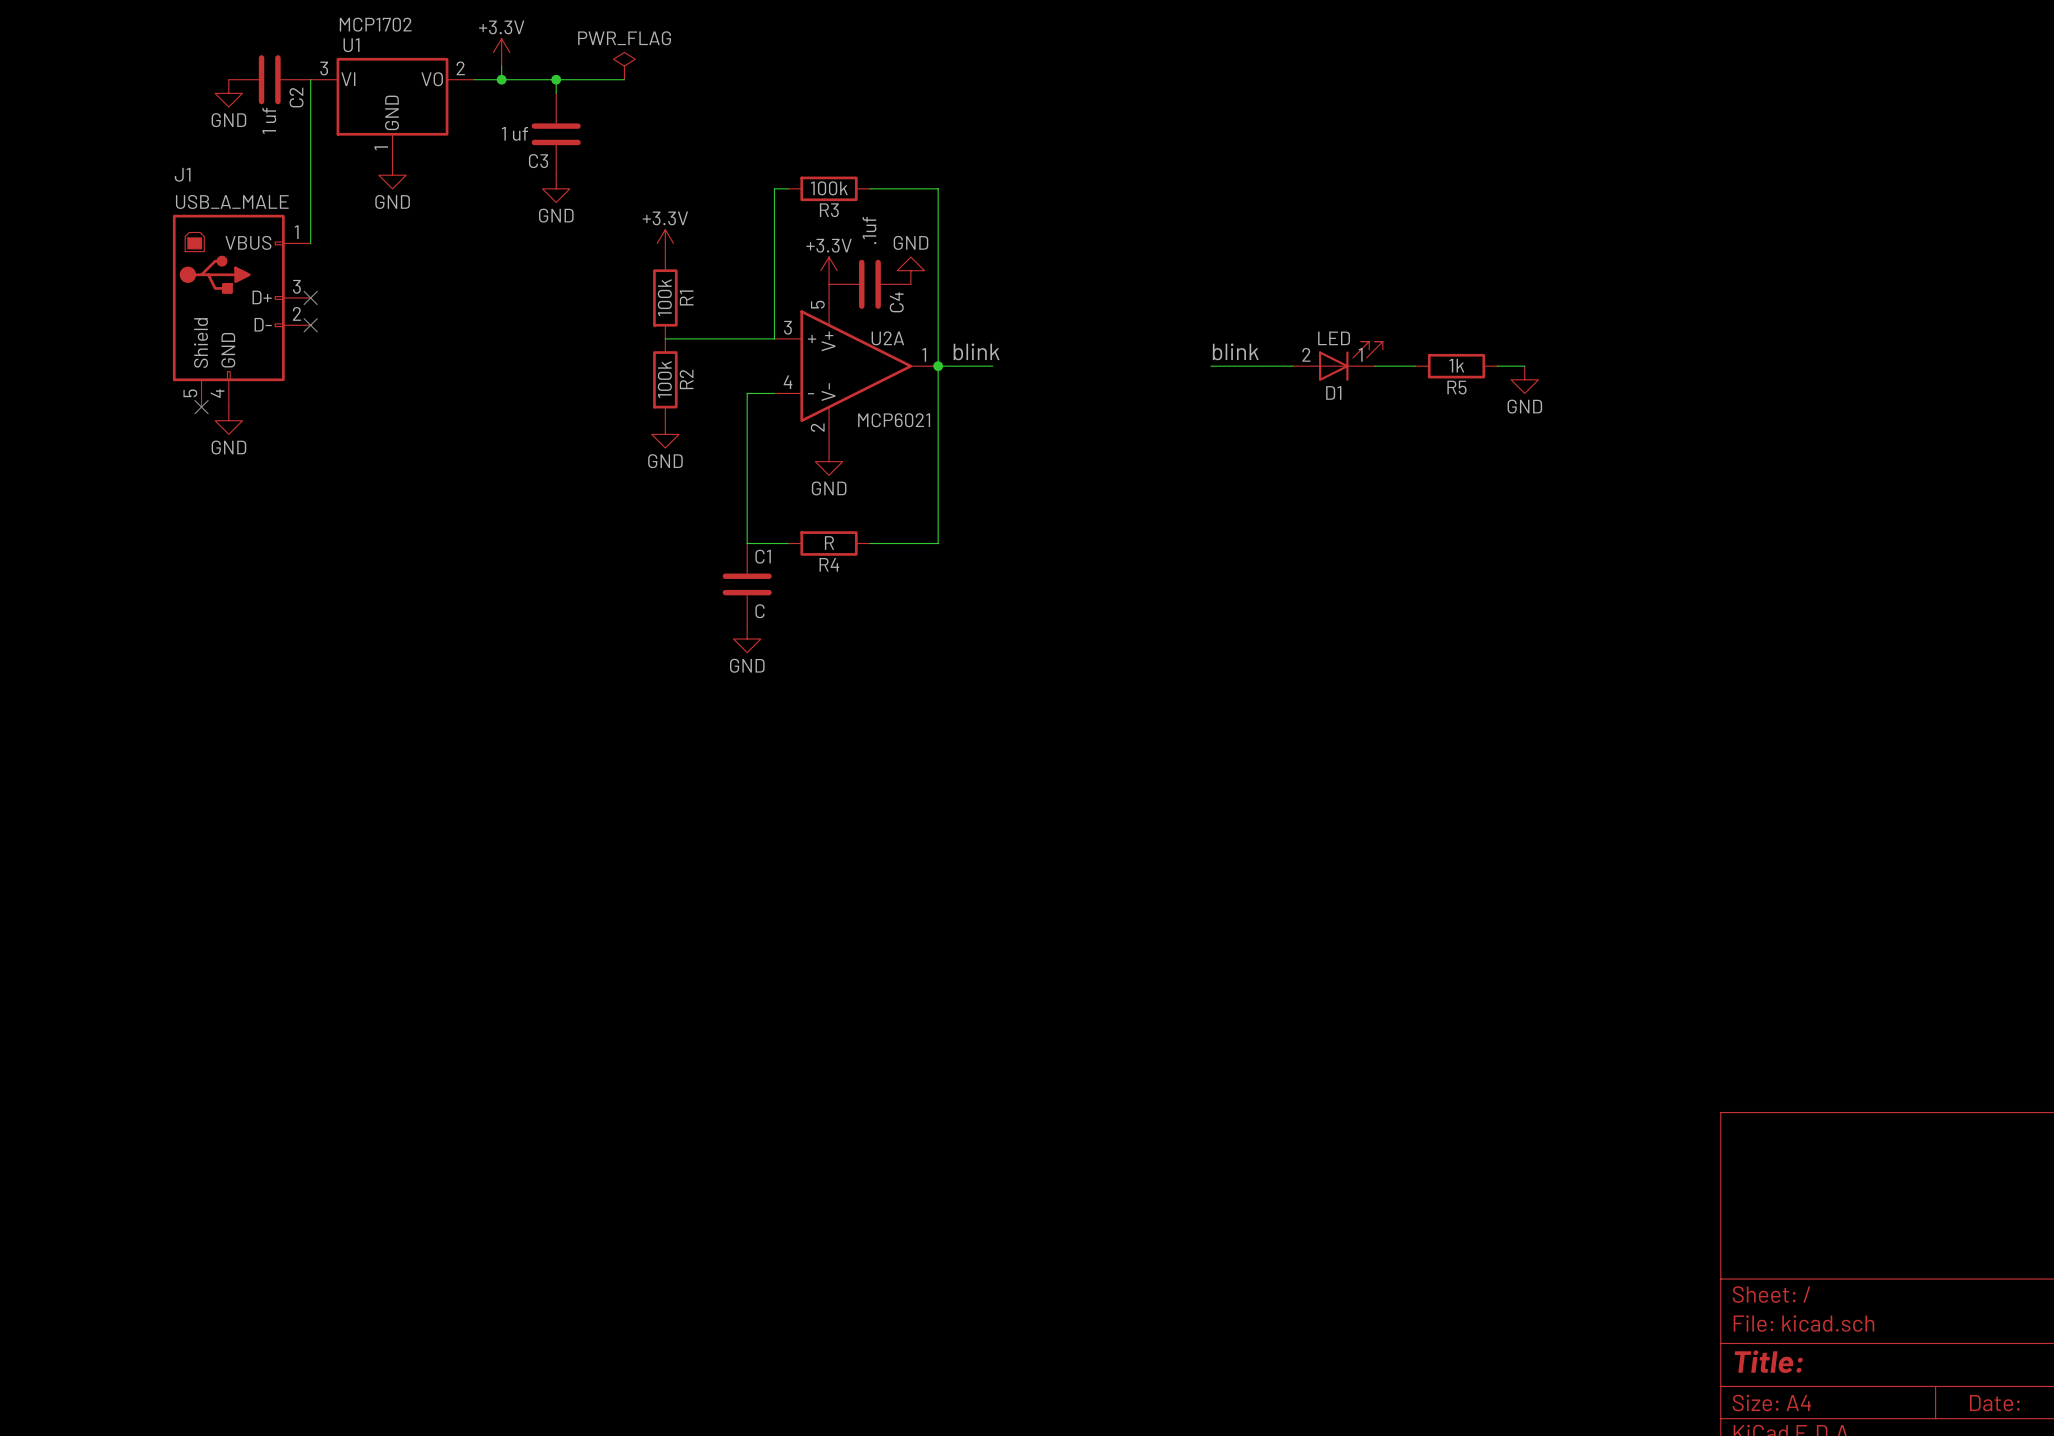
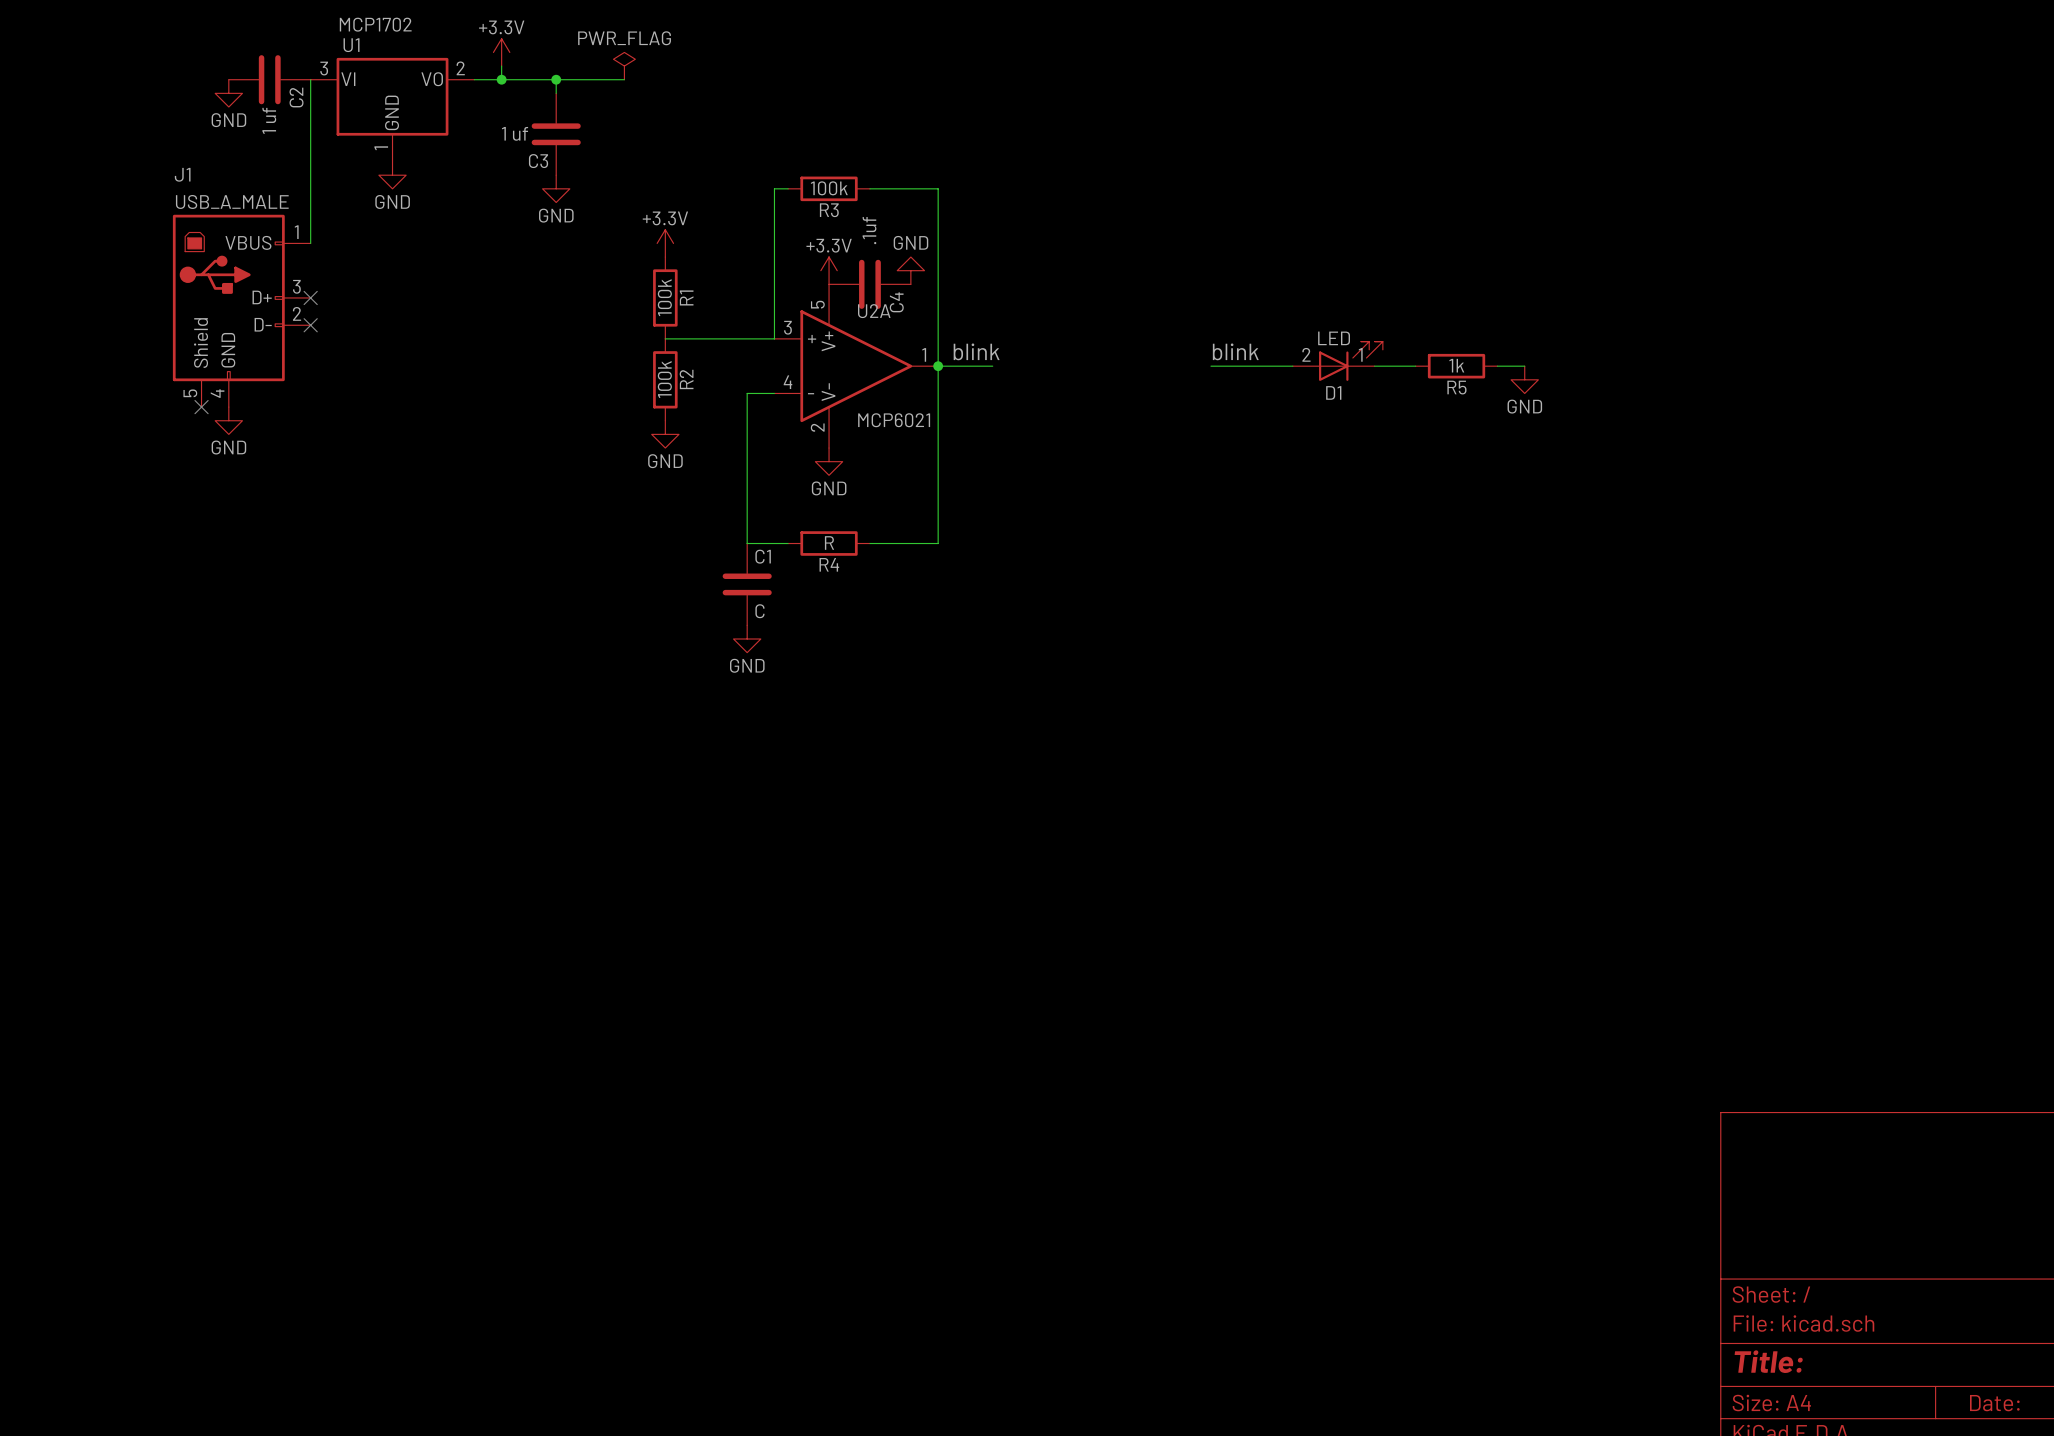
U2A name position: U2A (887, 338) -> U2A (874, 311)

